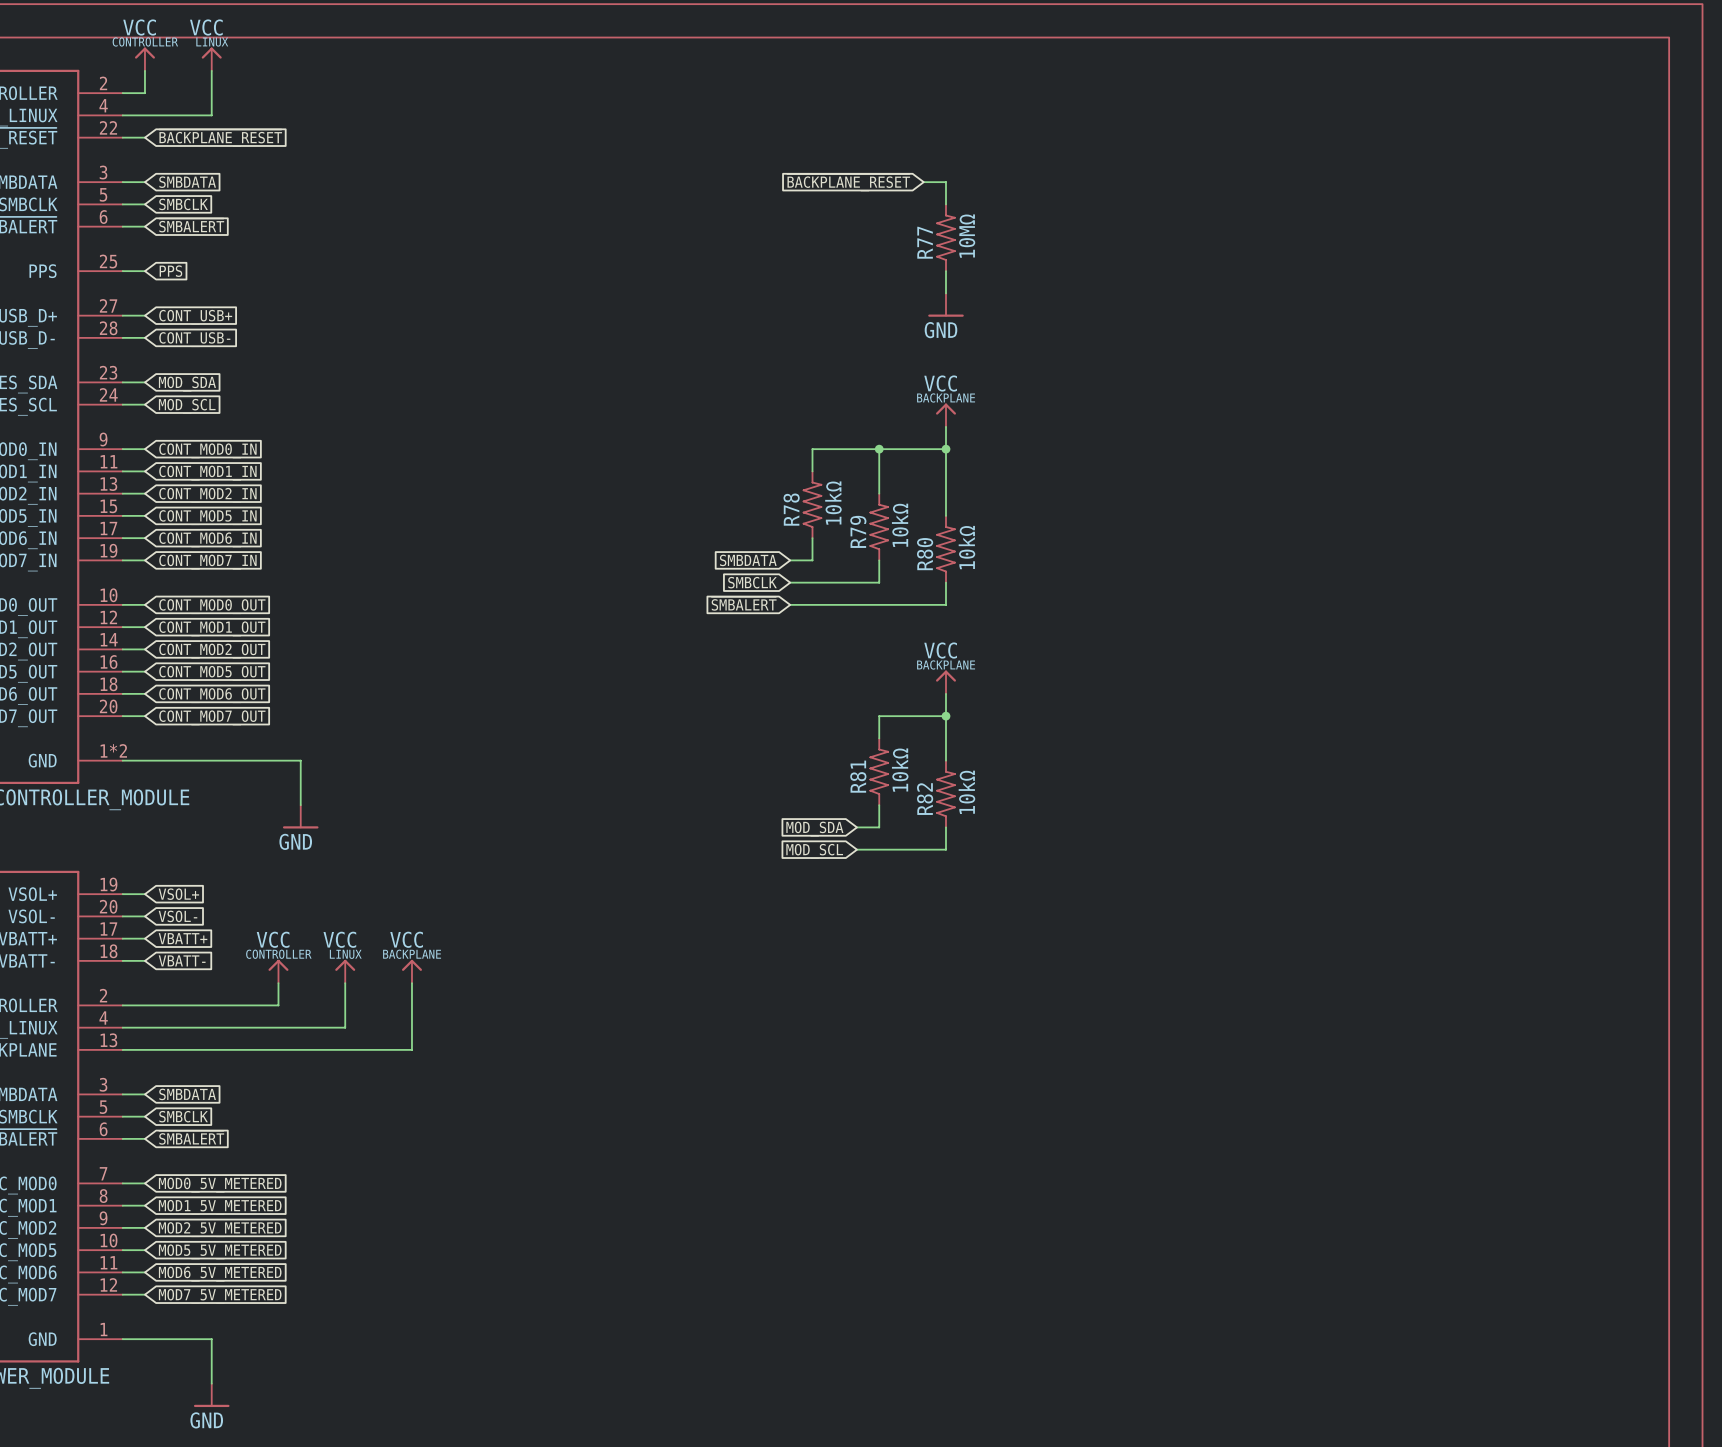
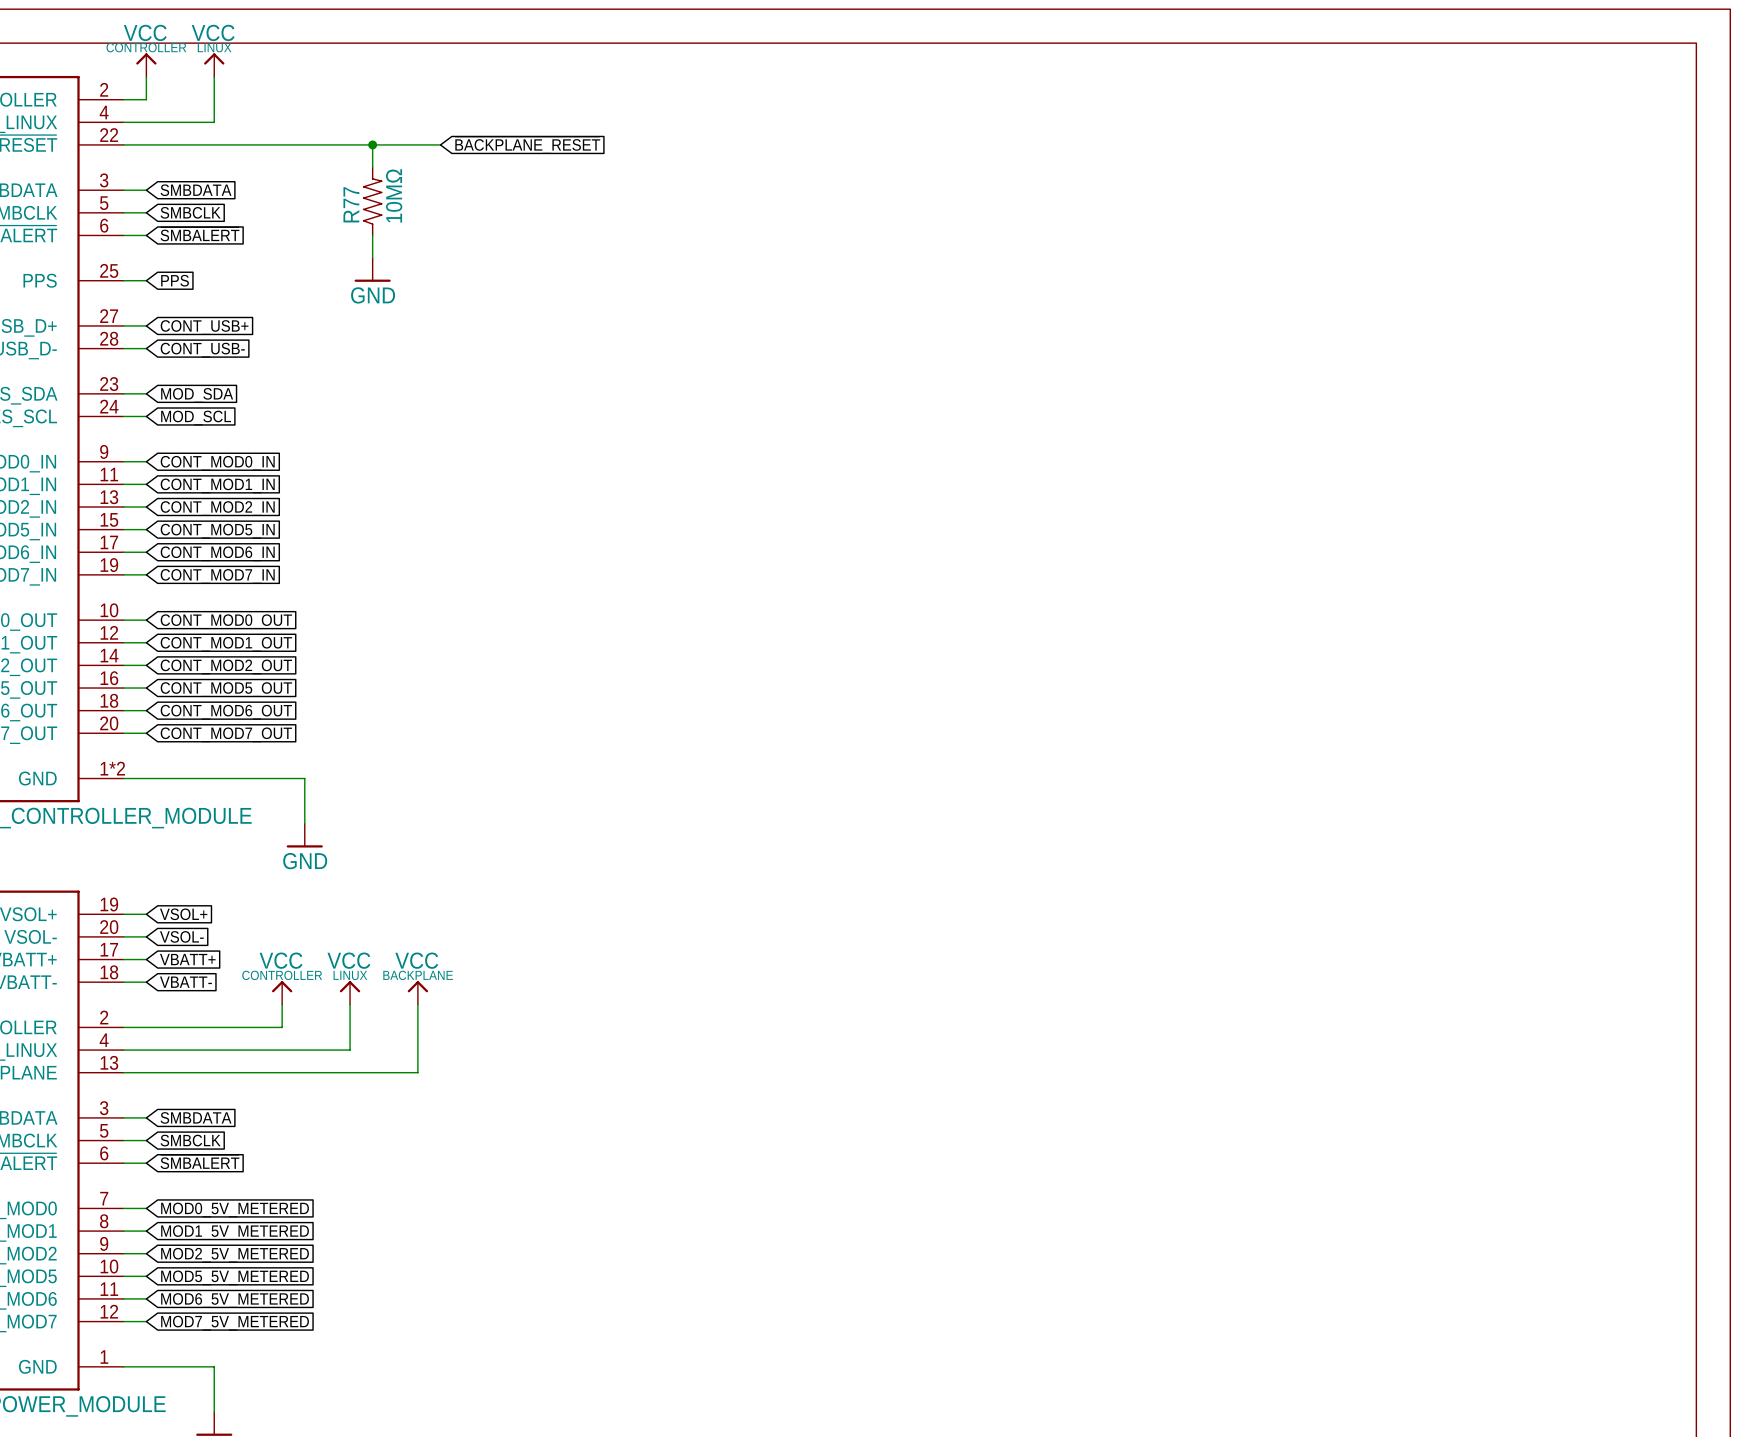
wire: none -> (146, 144) (440, 144)
wire: none -> (372, 144) (372, 167)
junction: none -> (372, 144)
global label: ~{BACKPLANE_RESET} (220, 138) -> none
global label: none -> ~{BACKPLANE_RESET} (527, 145)
global label: ~{BACKPLANE_RESET} (848, 182) -> none
wire: (923, 182) (945, 182) (945, 204) -> none
wire: none -> (372, 235) (372, 258)
R77 position: (945, 237) -> (372, 201)
power symbol: none -> GND (372, 269)
wire: (945, 271) (945, 293) -> none
power symbol: GND (945, 305) -> none
power symbol: (945, 415) -> none
wire: (945, 426) (945, 515) -> none
wire: (879, 449) (879, 493) -> none
junction: (879, 449) -> none
wire: (945, 449) (812, 449) (812, 471) -> none
junction: (945, 449) -> none
R78: 10kΩ (812, 504) -> none
R79: 10kΩ (879, 527) -> none
wire: (812, 538) (812, 560) (790, 560) -> none
R80: 10kΩ (945, 549) -> none
global label: SMBDATA (748, 560) -> none
wire: (879, 560) (879, 582) (790, 582) -> none
global label: SMBCLK (752, 582) -> none
wire: (945, 582) (945, 604) (790, 604) -> none
global label: ~{SMBALERT} (744, 603) -> none
power symbol: (945, 682) -> none
wire: (945, 693) (945, 760) -> none
wire: (945, 716) (879, 716) (879, 738) -> none
junction: (945, 716) -> none
R81: 10kΩ (879, 771) -> none
R82: 10kΩ (945, 794) -> none
wire: (879, 805) (879, 827) (856, 827) -> none
wire: (945, 827) (945, 849) (856, 849) -> none
global label: MOD_SDA (814, 829) -> none
global label: MOD_SCL (814, 851) -> none

